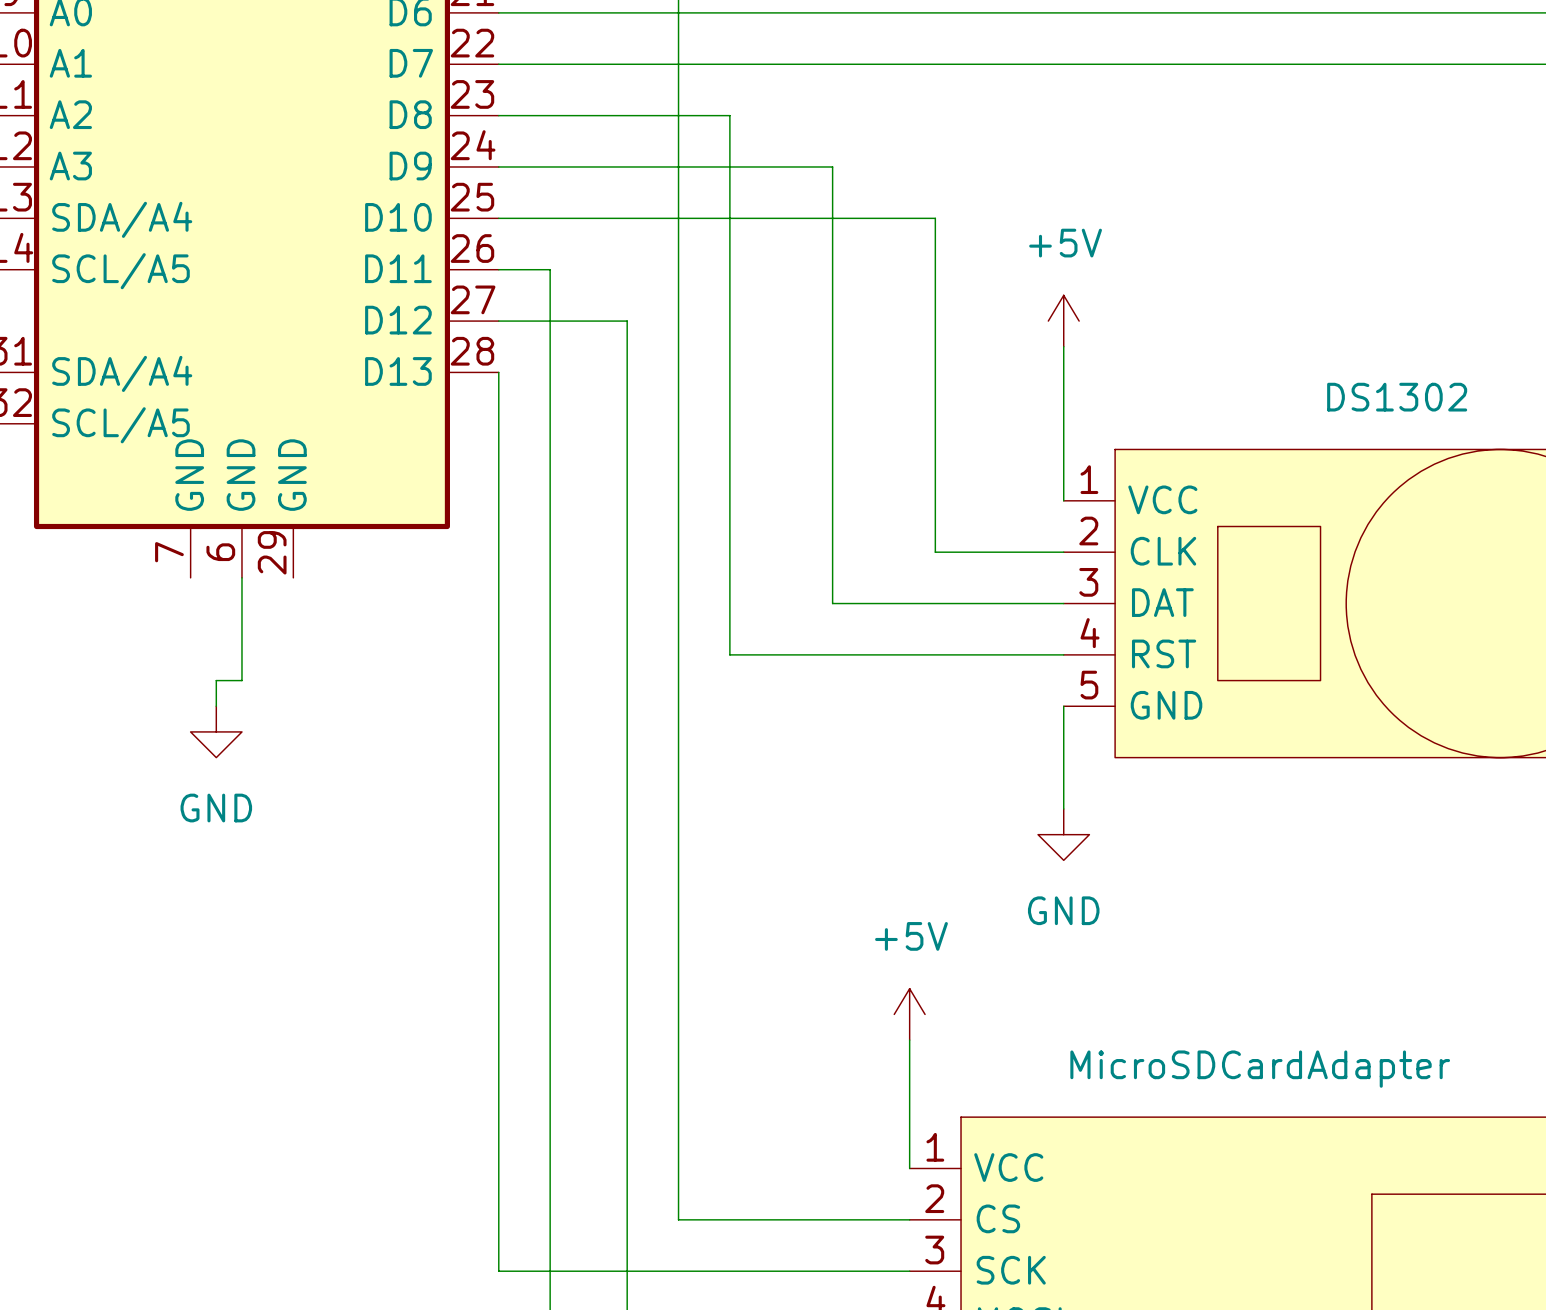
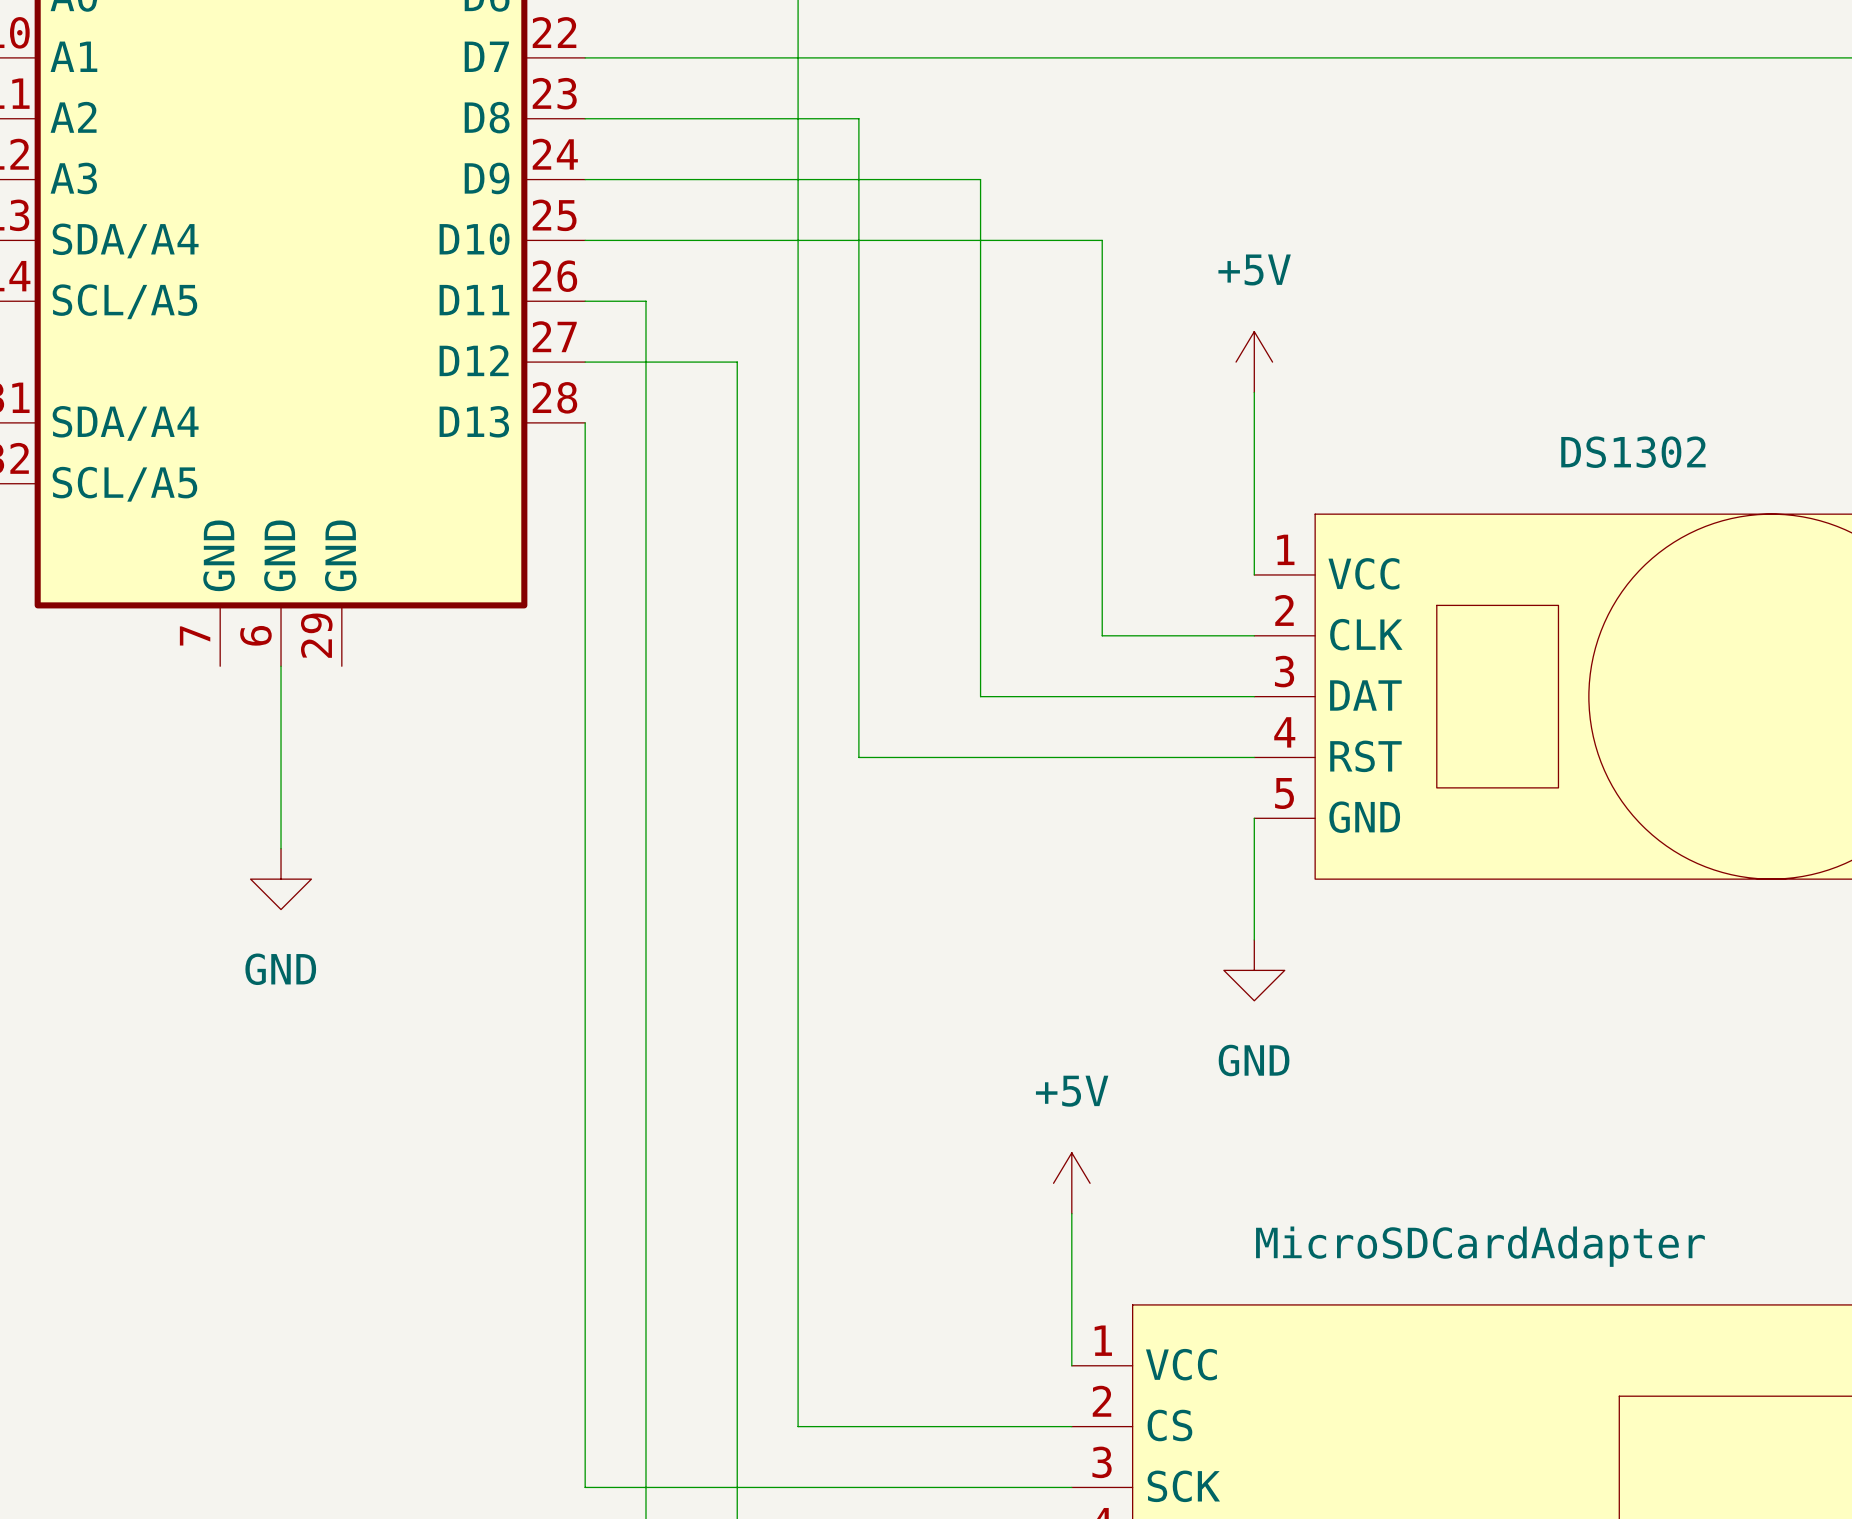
wire: (241, 680) (216, 680) (216, 706) -> (281, 787) (281, 848)
power symbol position: GND (216, 731) -> GND (281, 879)

